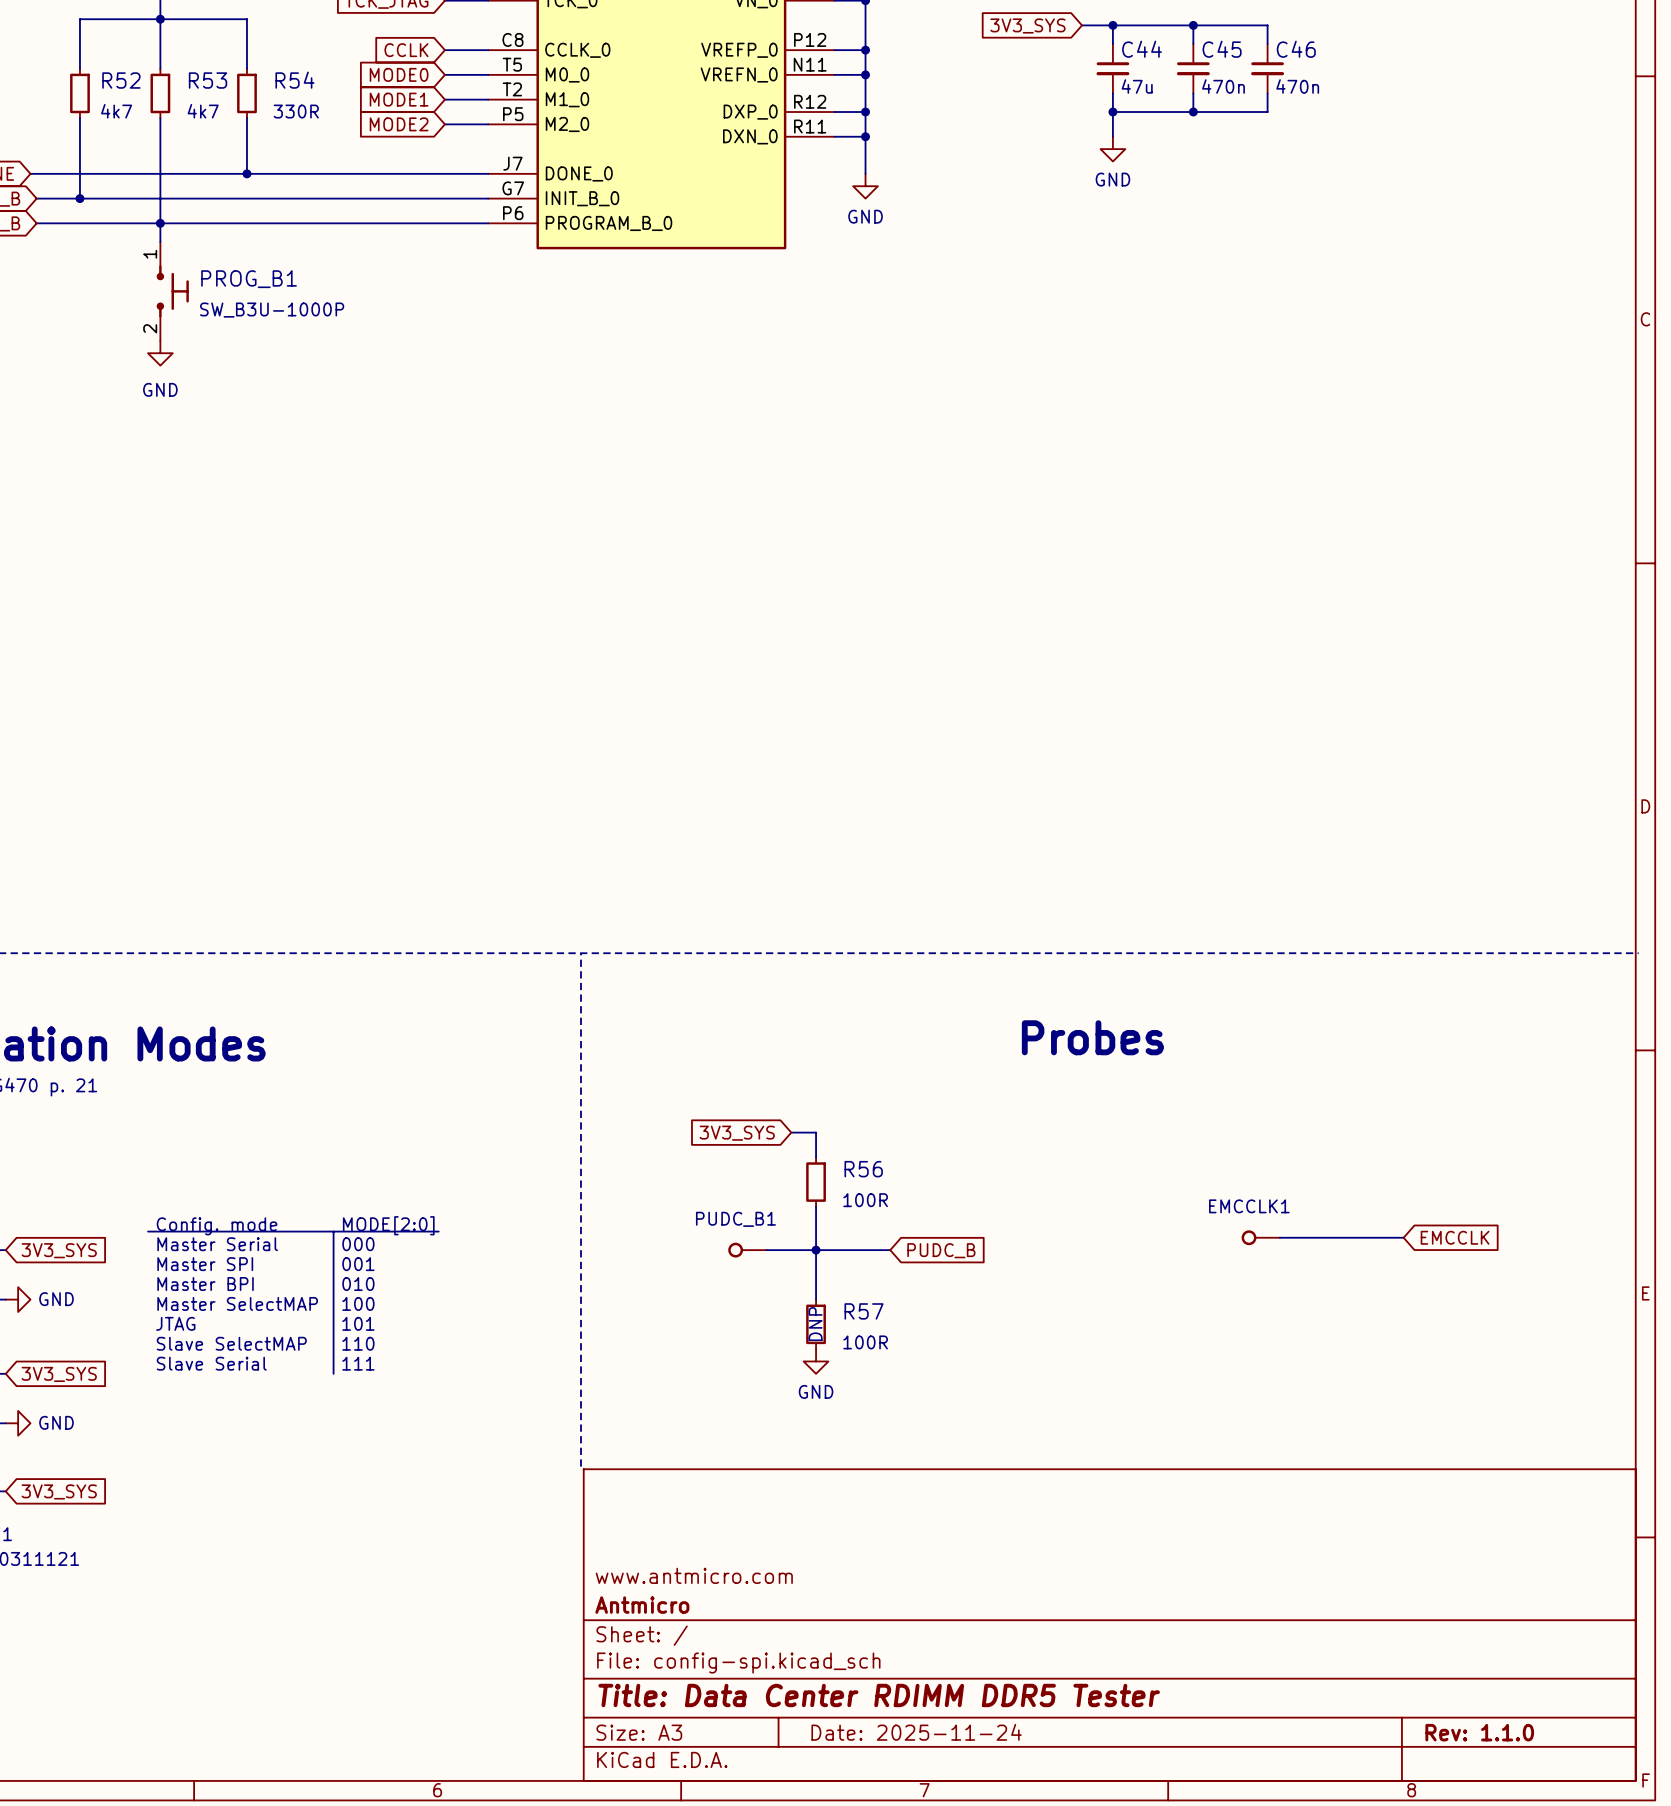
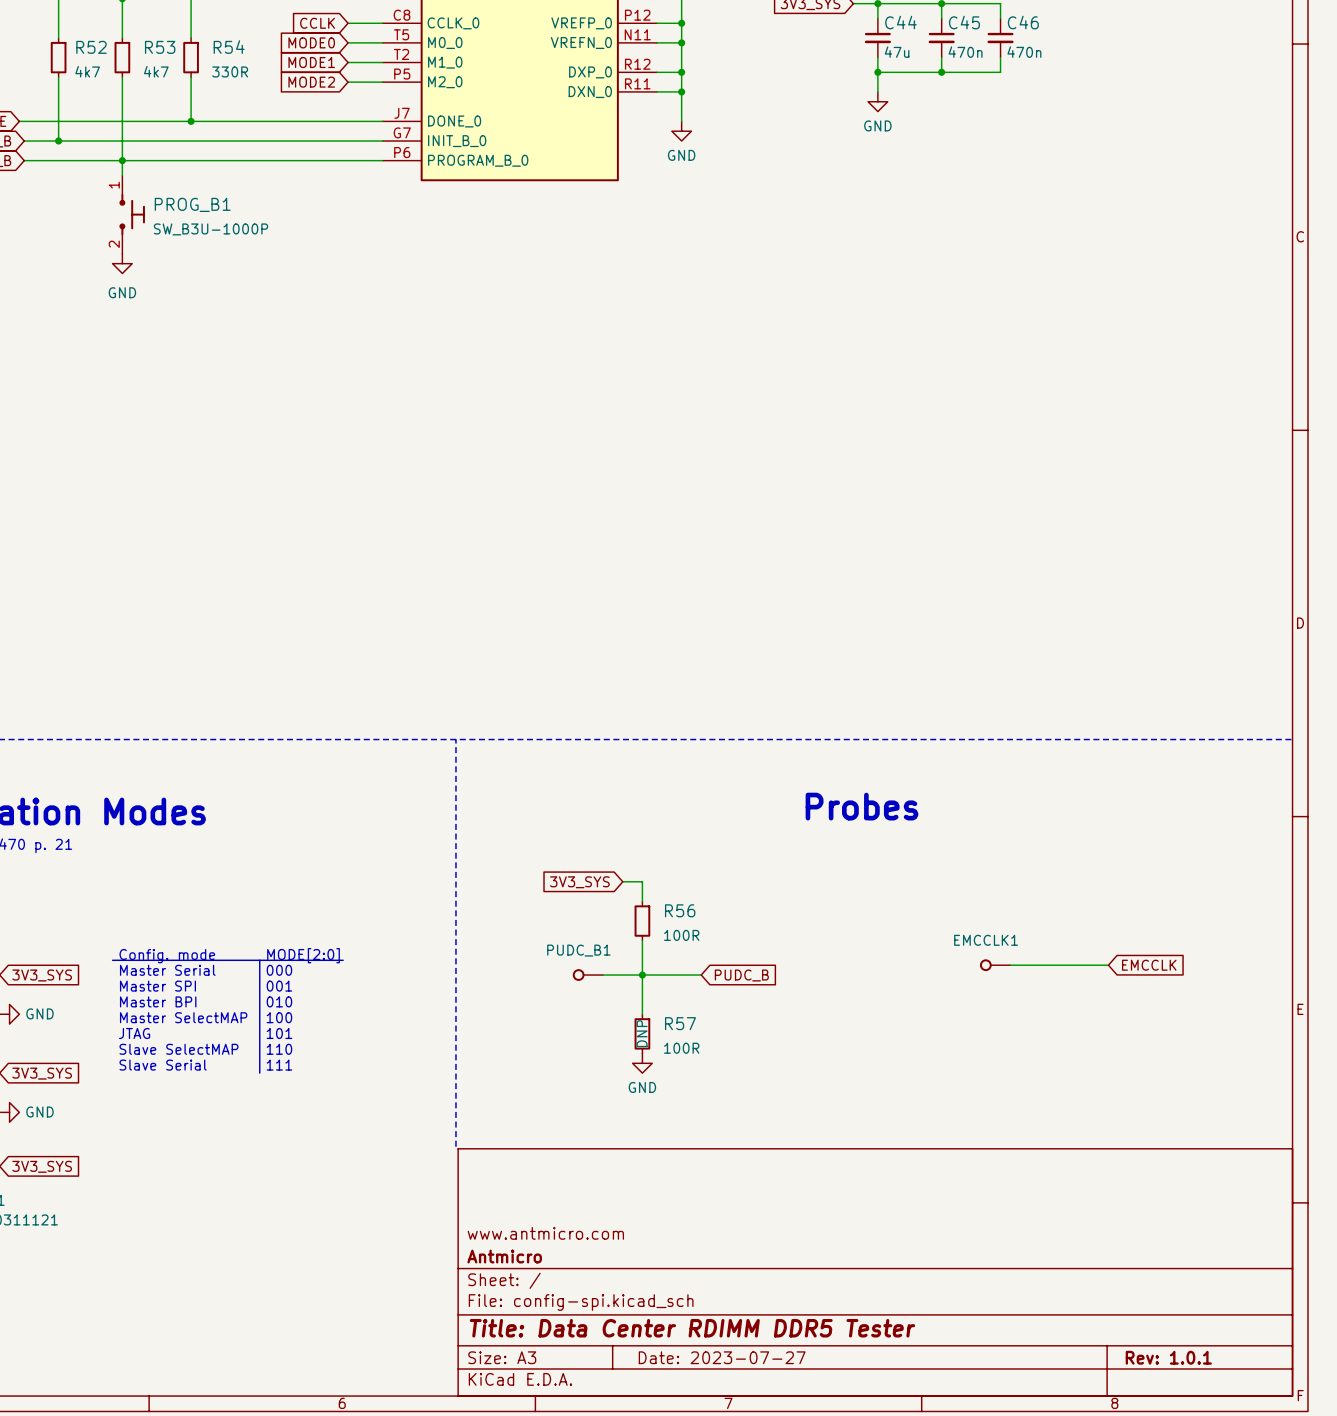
title block: Date: 2025-11-24 (916, 1732) -> Date: 2023-07-27 (722, 1357)
title block: Rev: 1.1.0 (1479, 1732) -> Rev: 1.0.1 (1168, 1357)

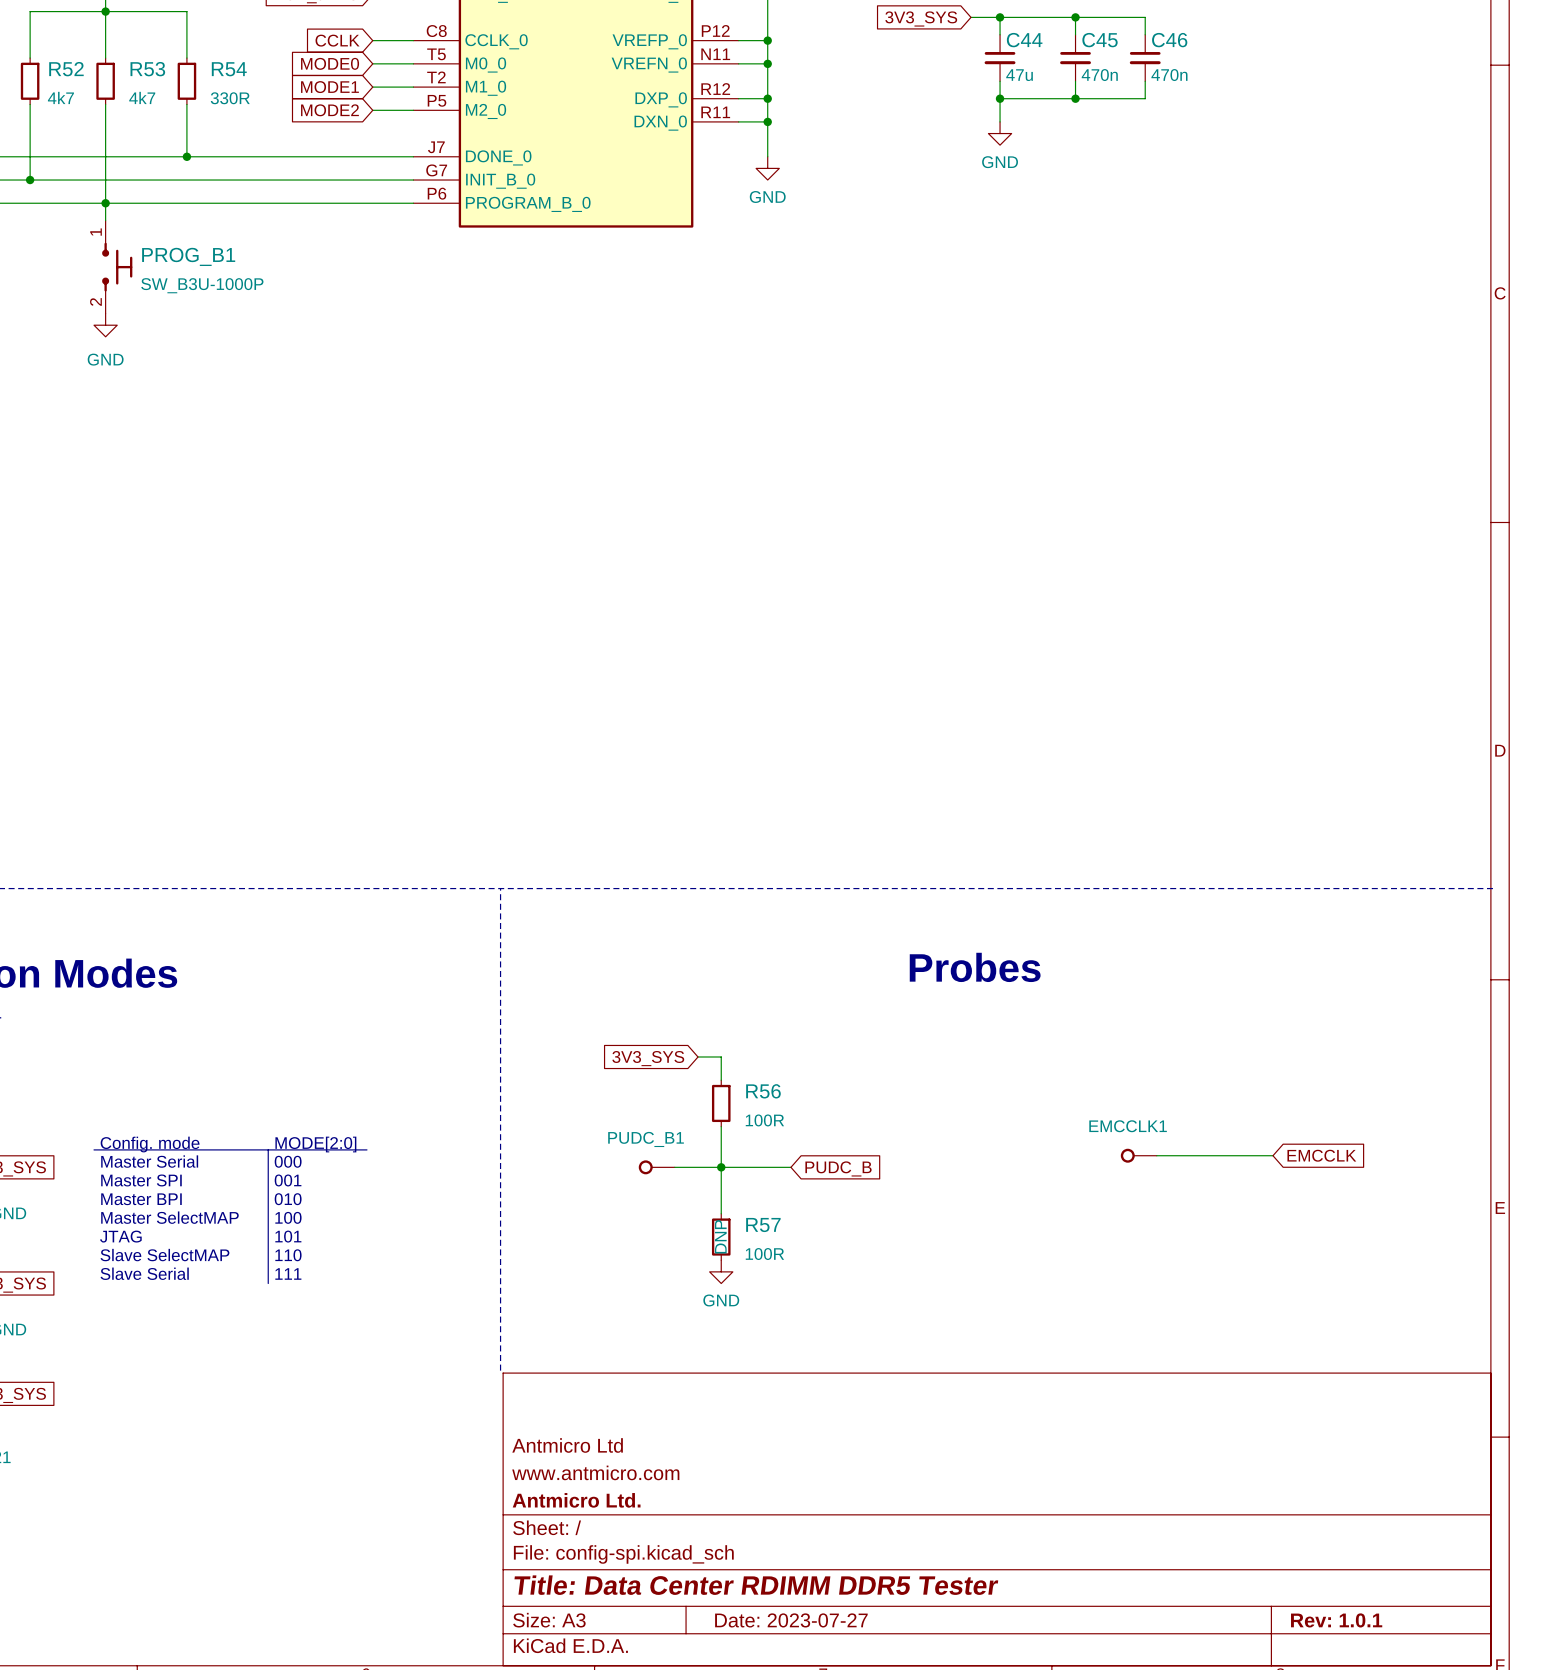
title block: none -> Antmicro Ltd (567, 1445)
title block: Antmicro (504, 1256) -> Antmicro Ltd. (576, 1500)

